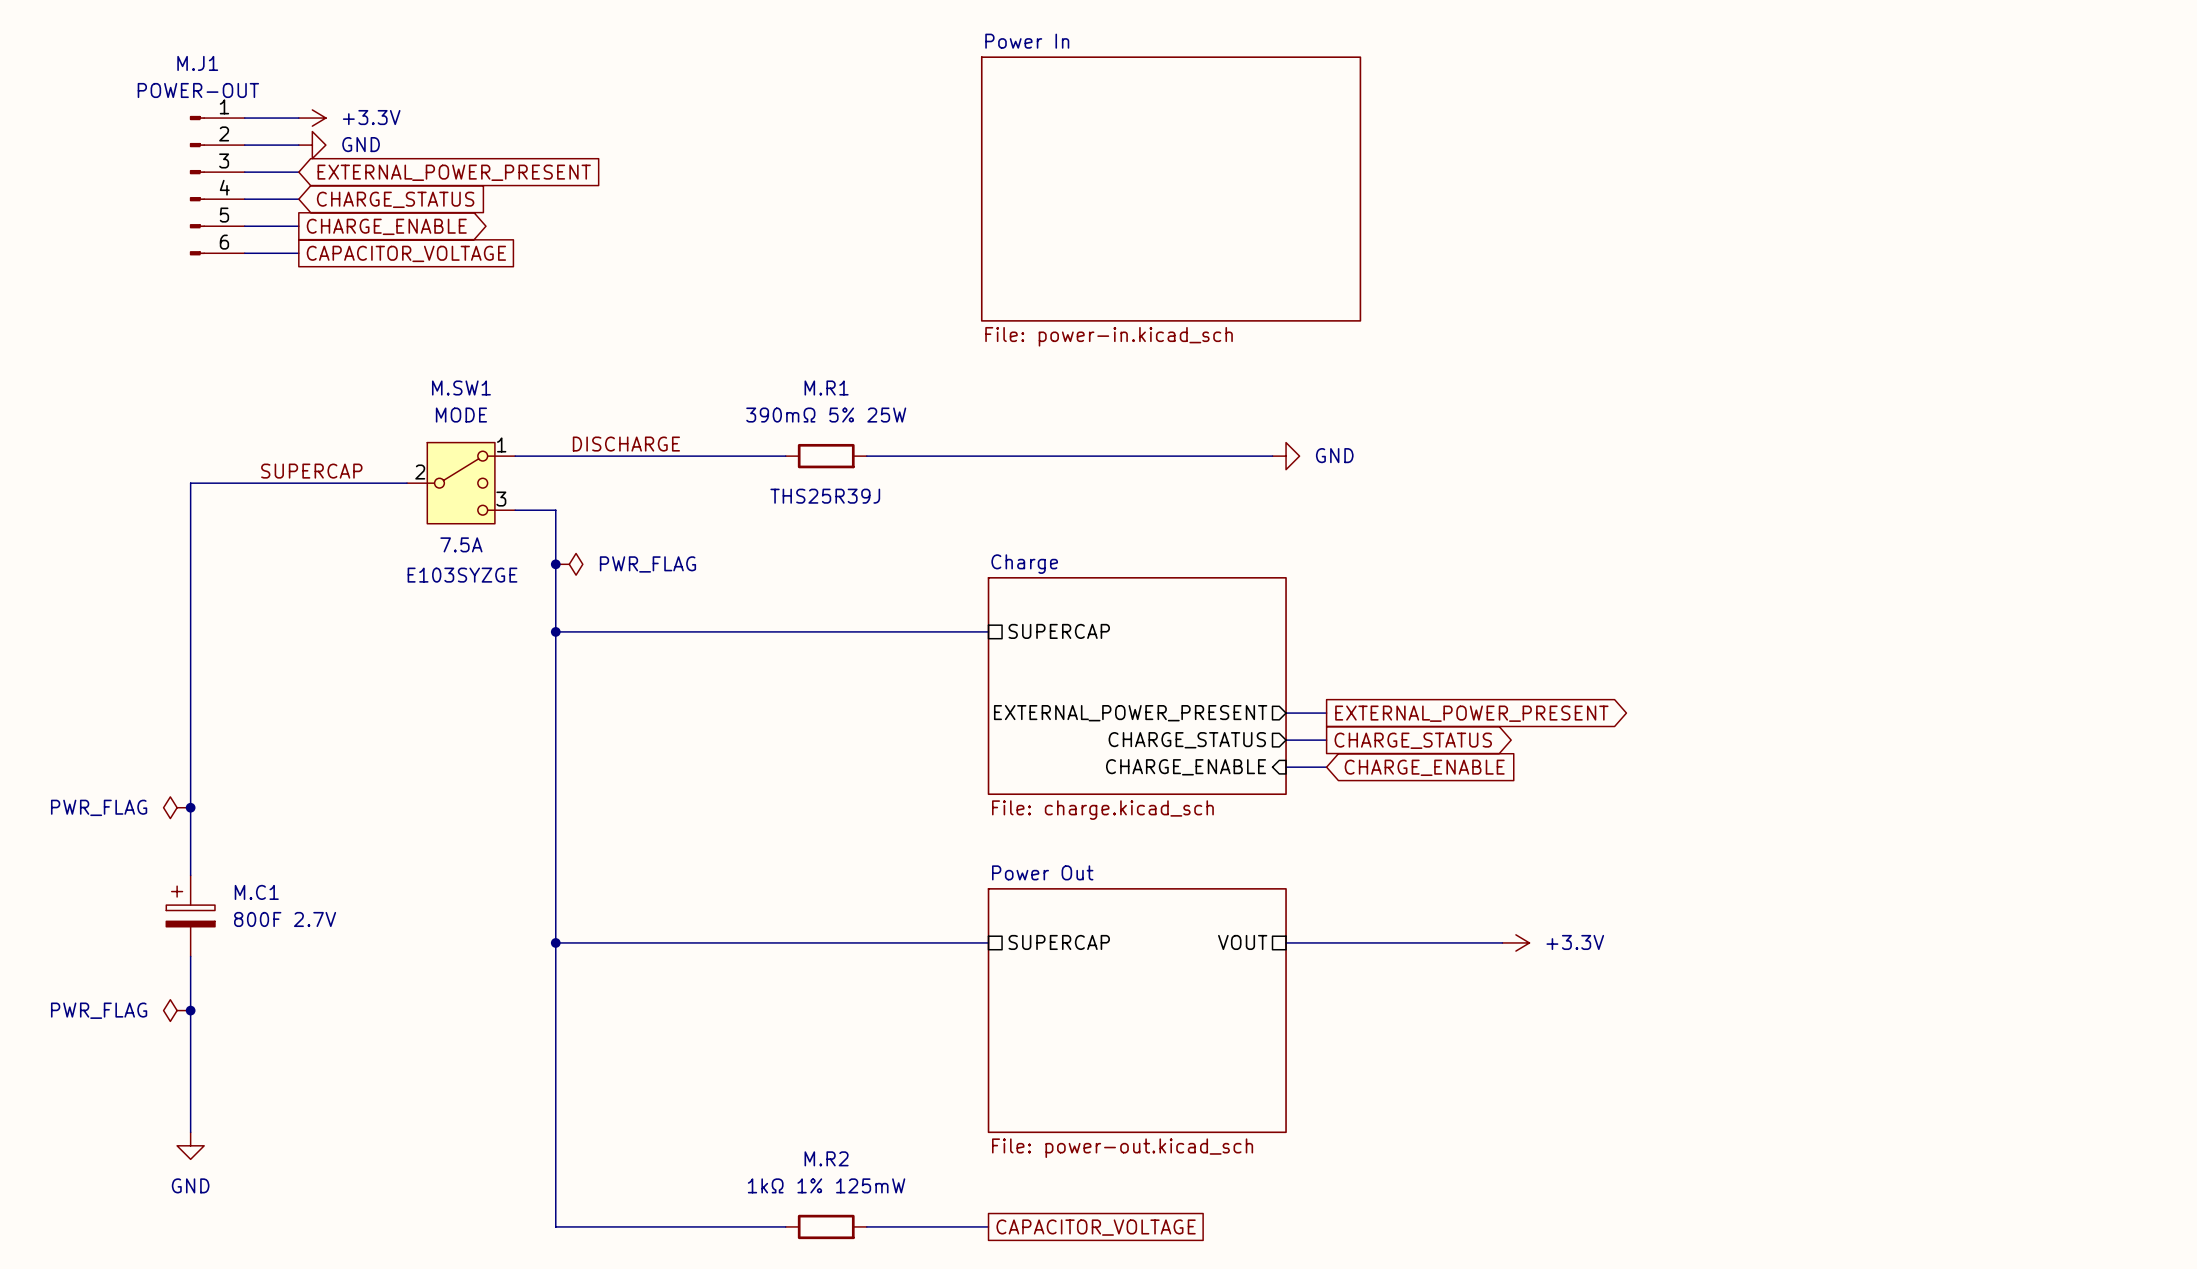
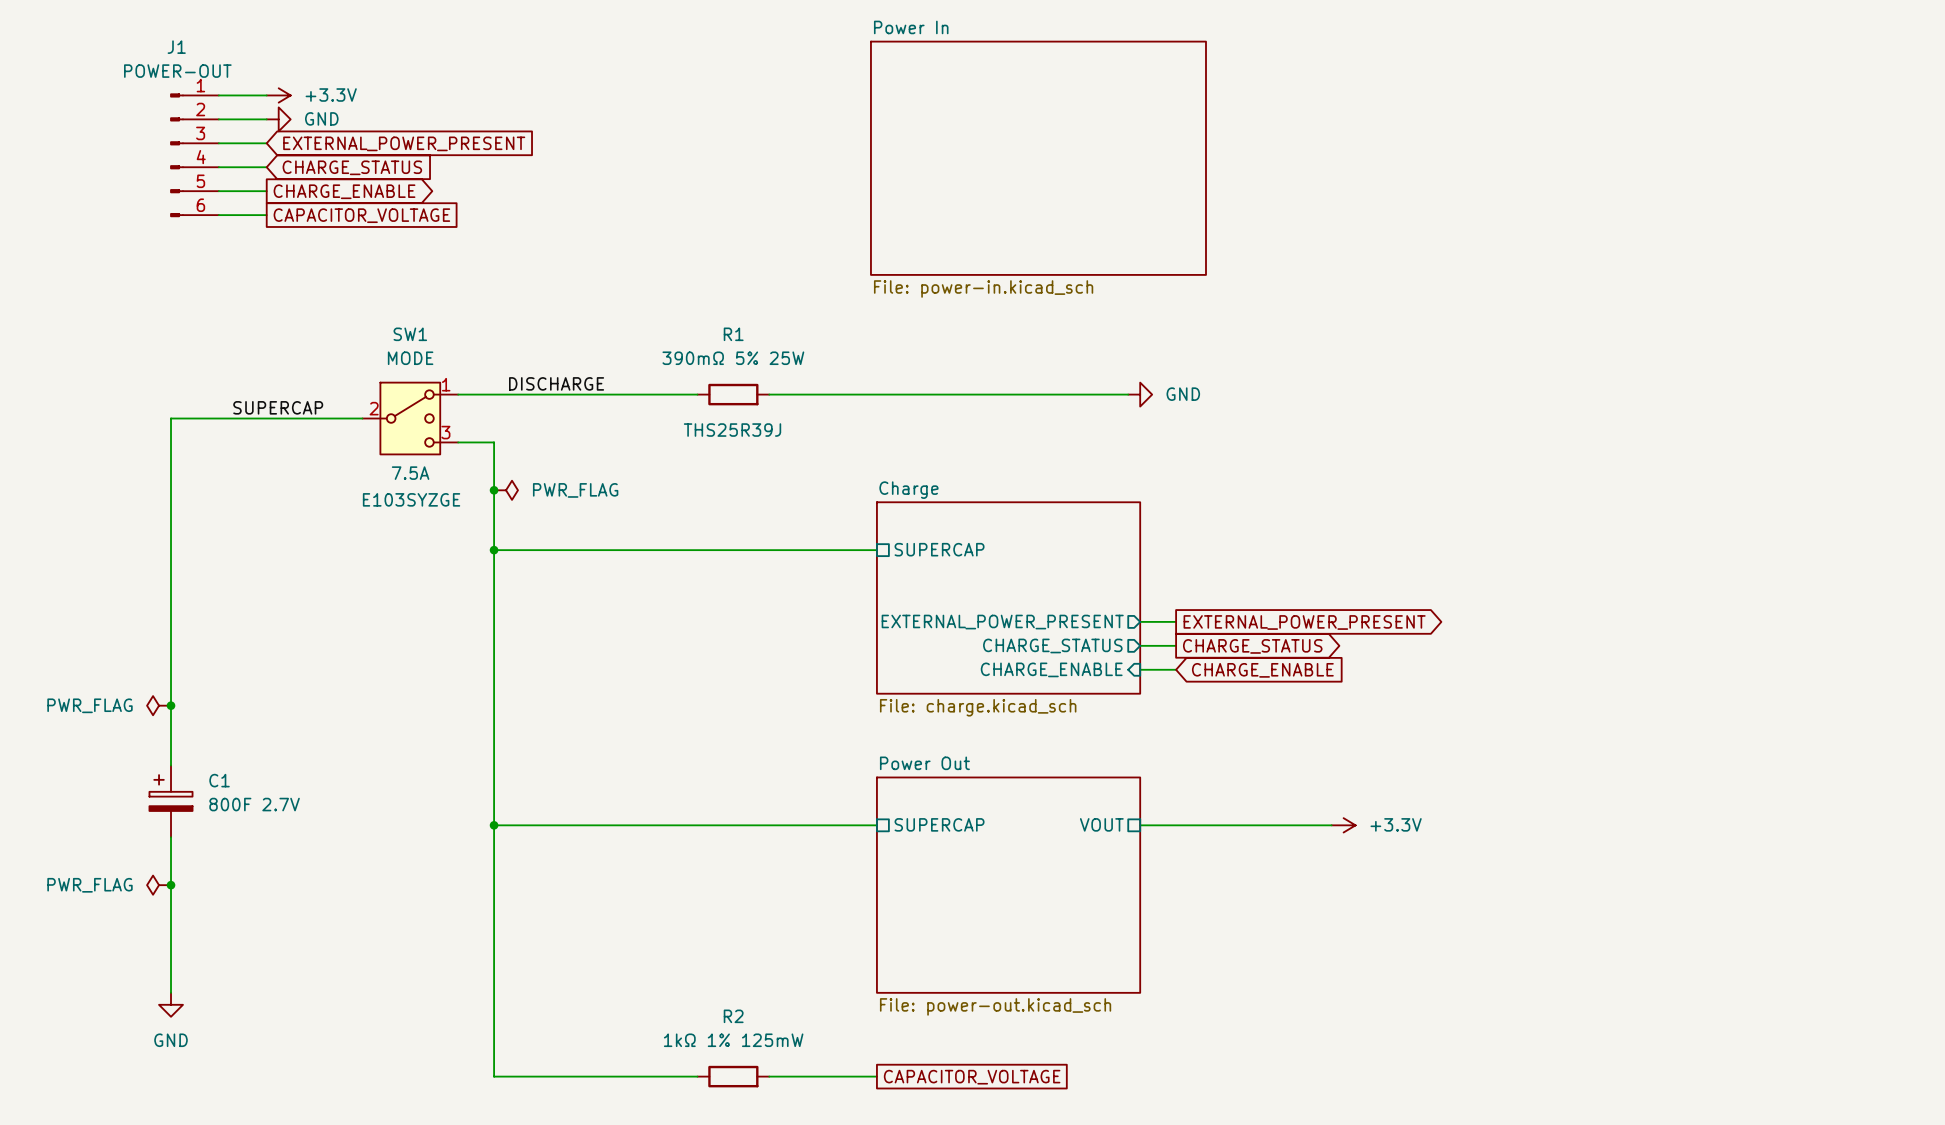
M.J1 name: M.J1 (197, 63) -> J1 (176, 47)
M.SW1 name: M.SW1 (461, 388) -> SW1 (410, 334)
M.R1 name: M.R1 (826, 388) -> R1 (733, 334)
M.C1 name: M.C1 (256, 892) -> C1 (219, 780)
M.R2 name: M.R2 (826, 1158) -> R2 (733, 1016)

